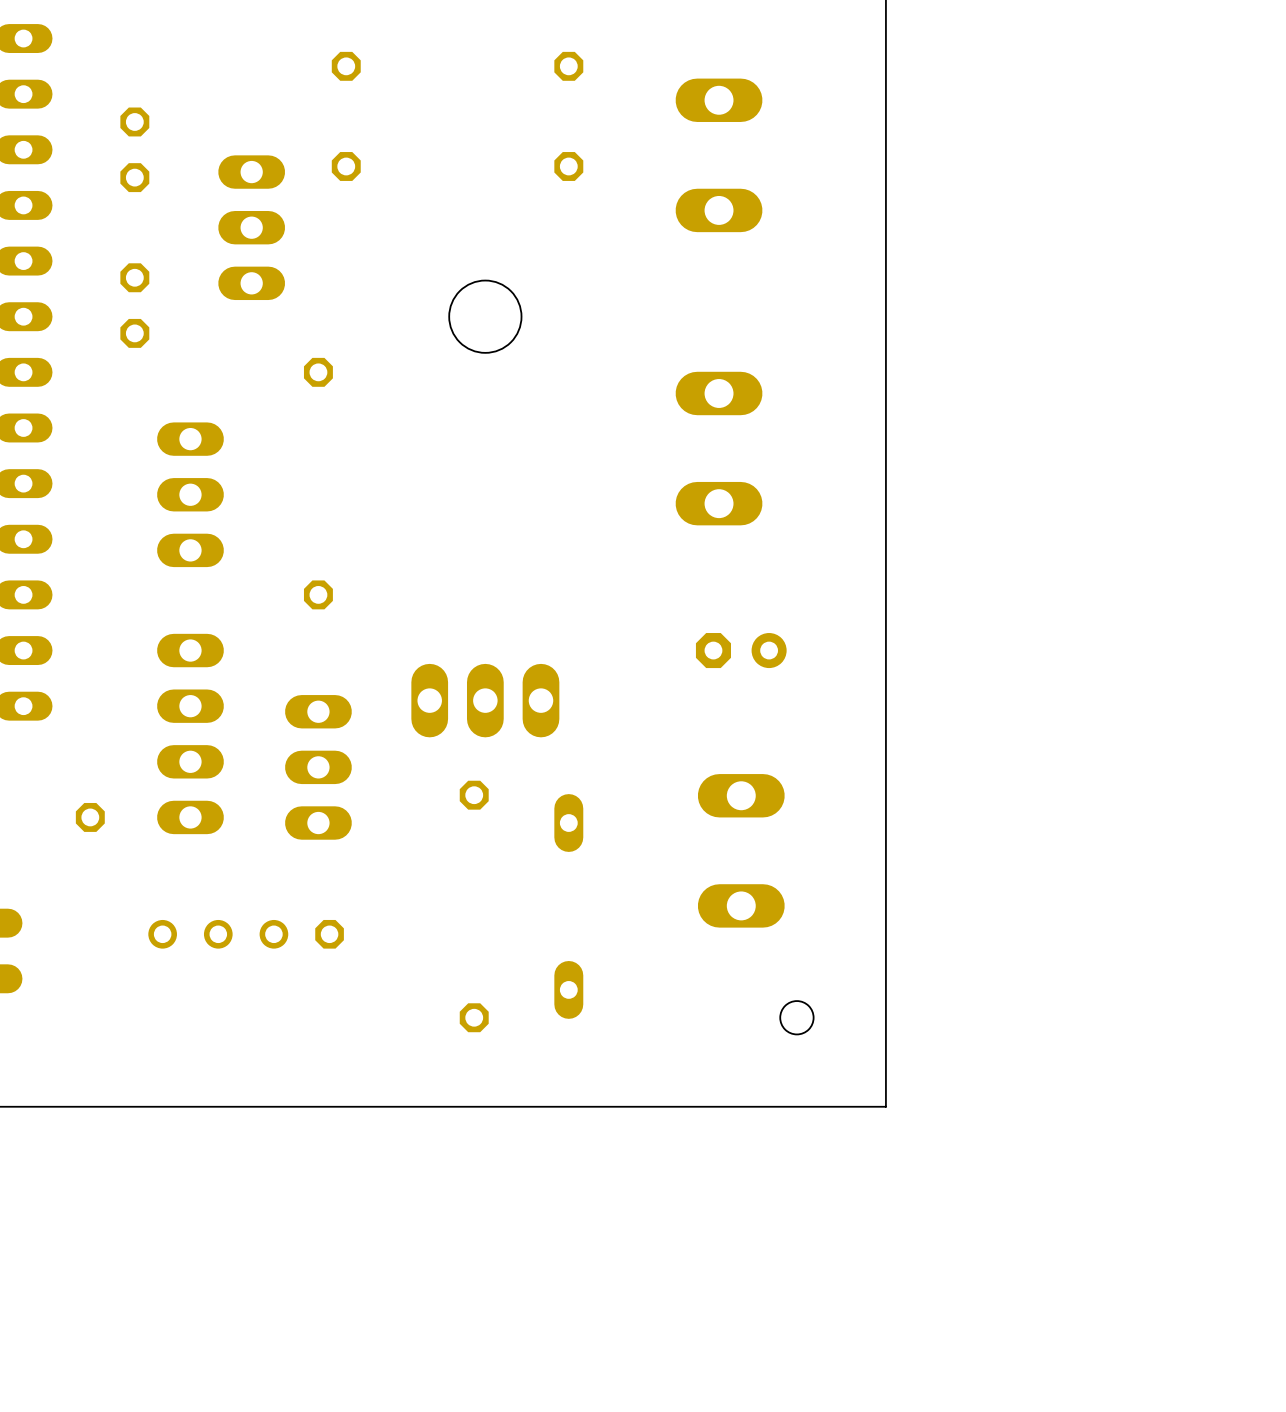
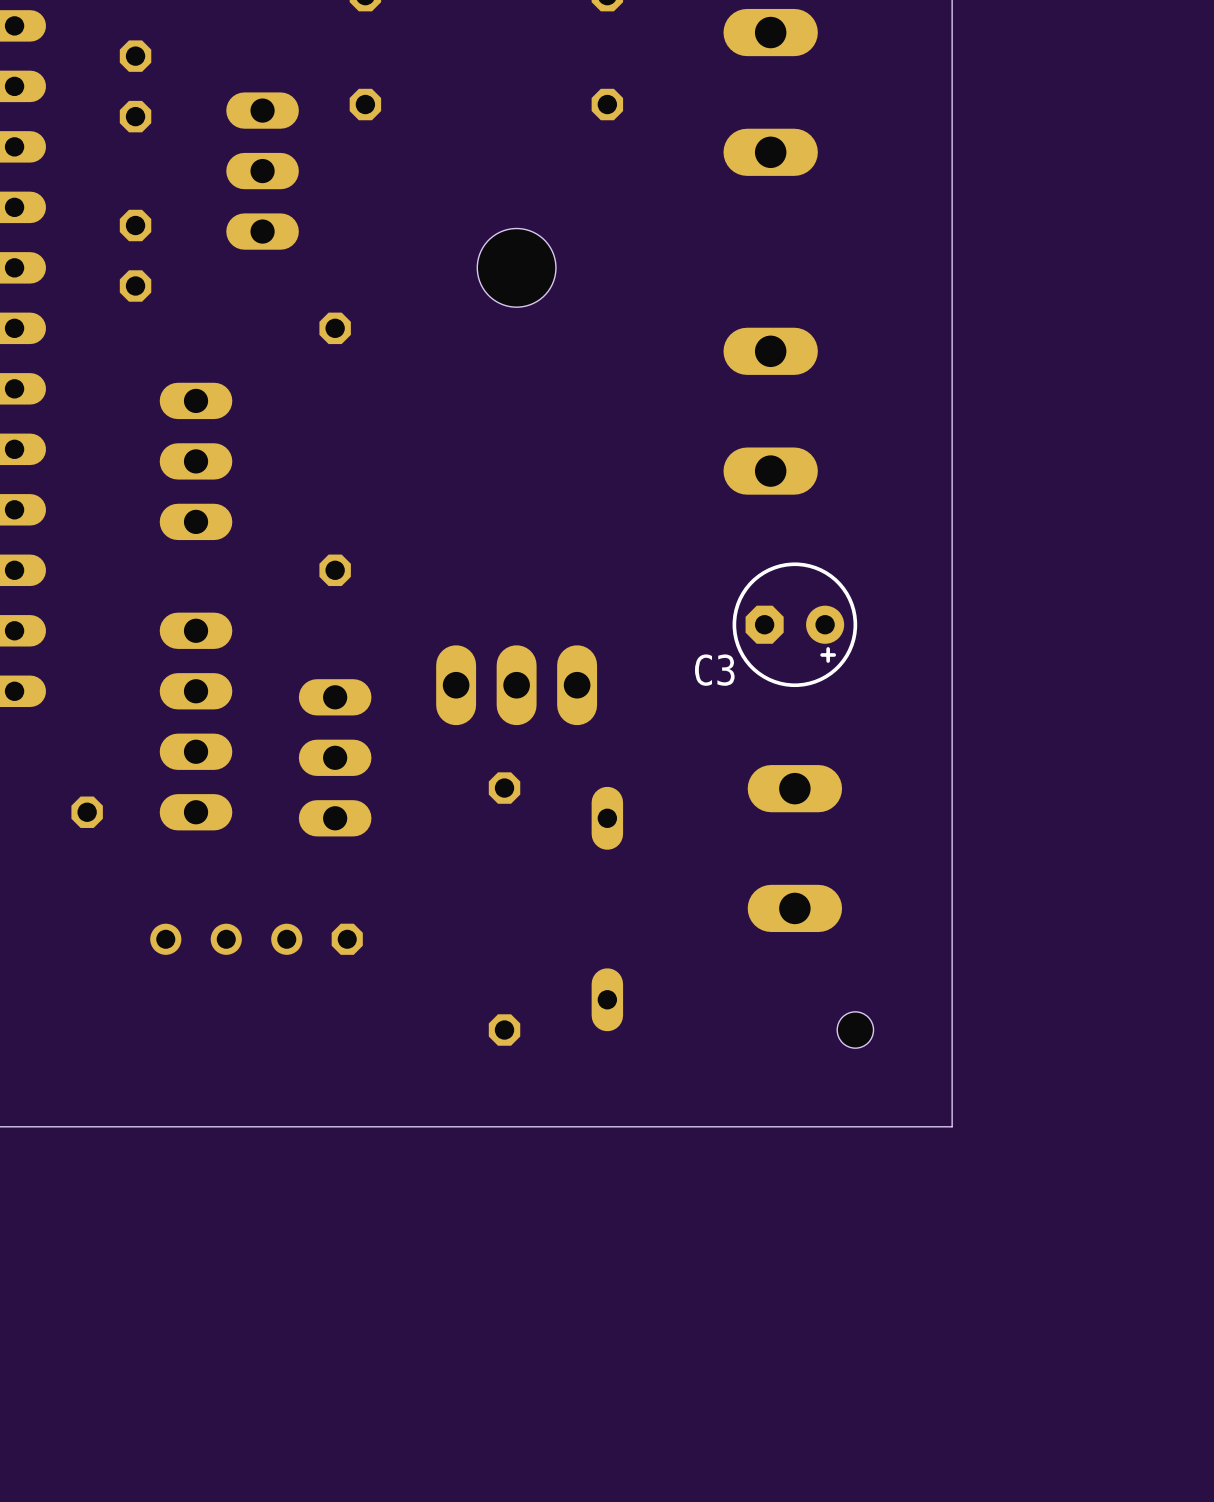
C3 side: top (741, 650) -> bottom (794, 624)

